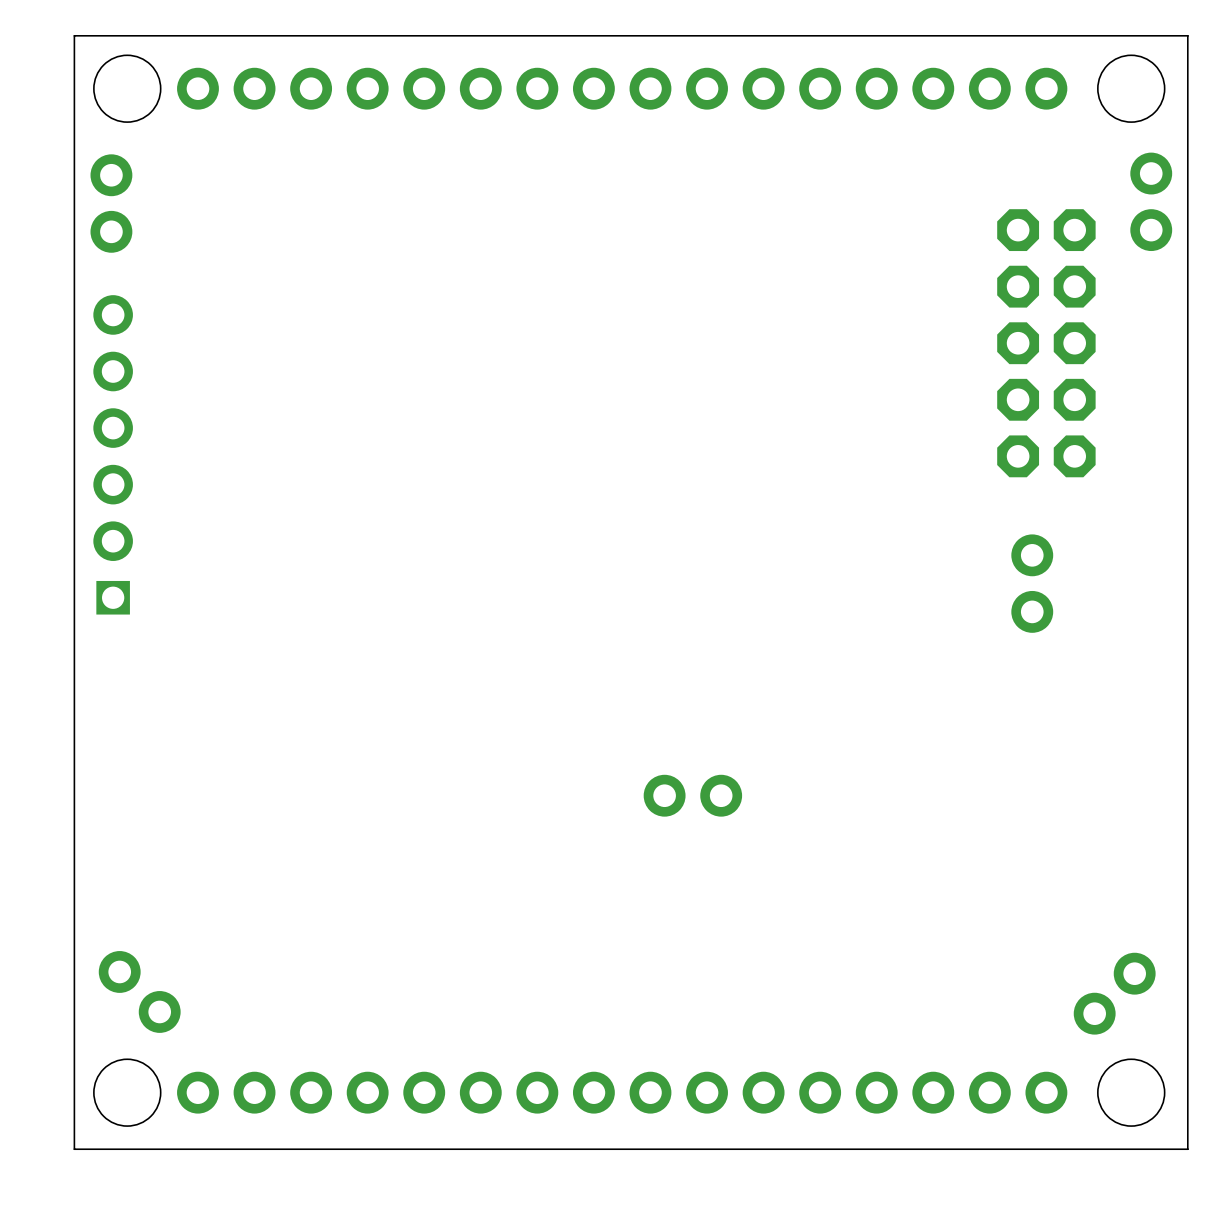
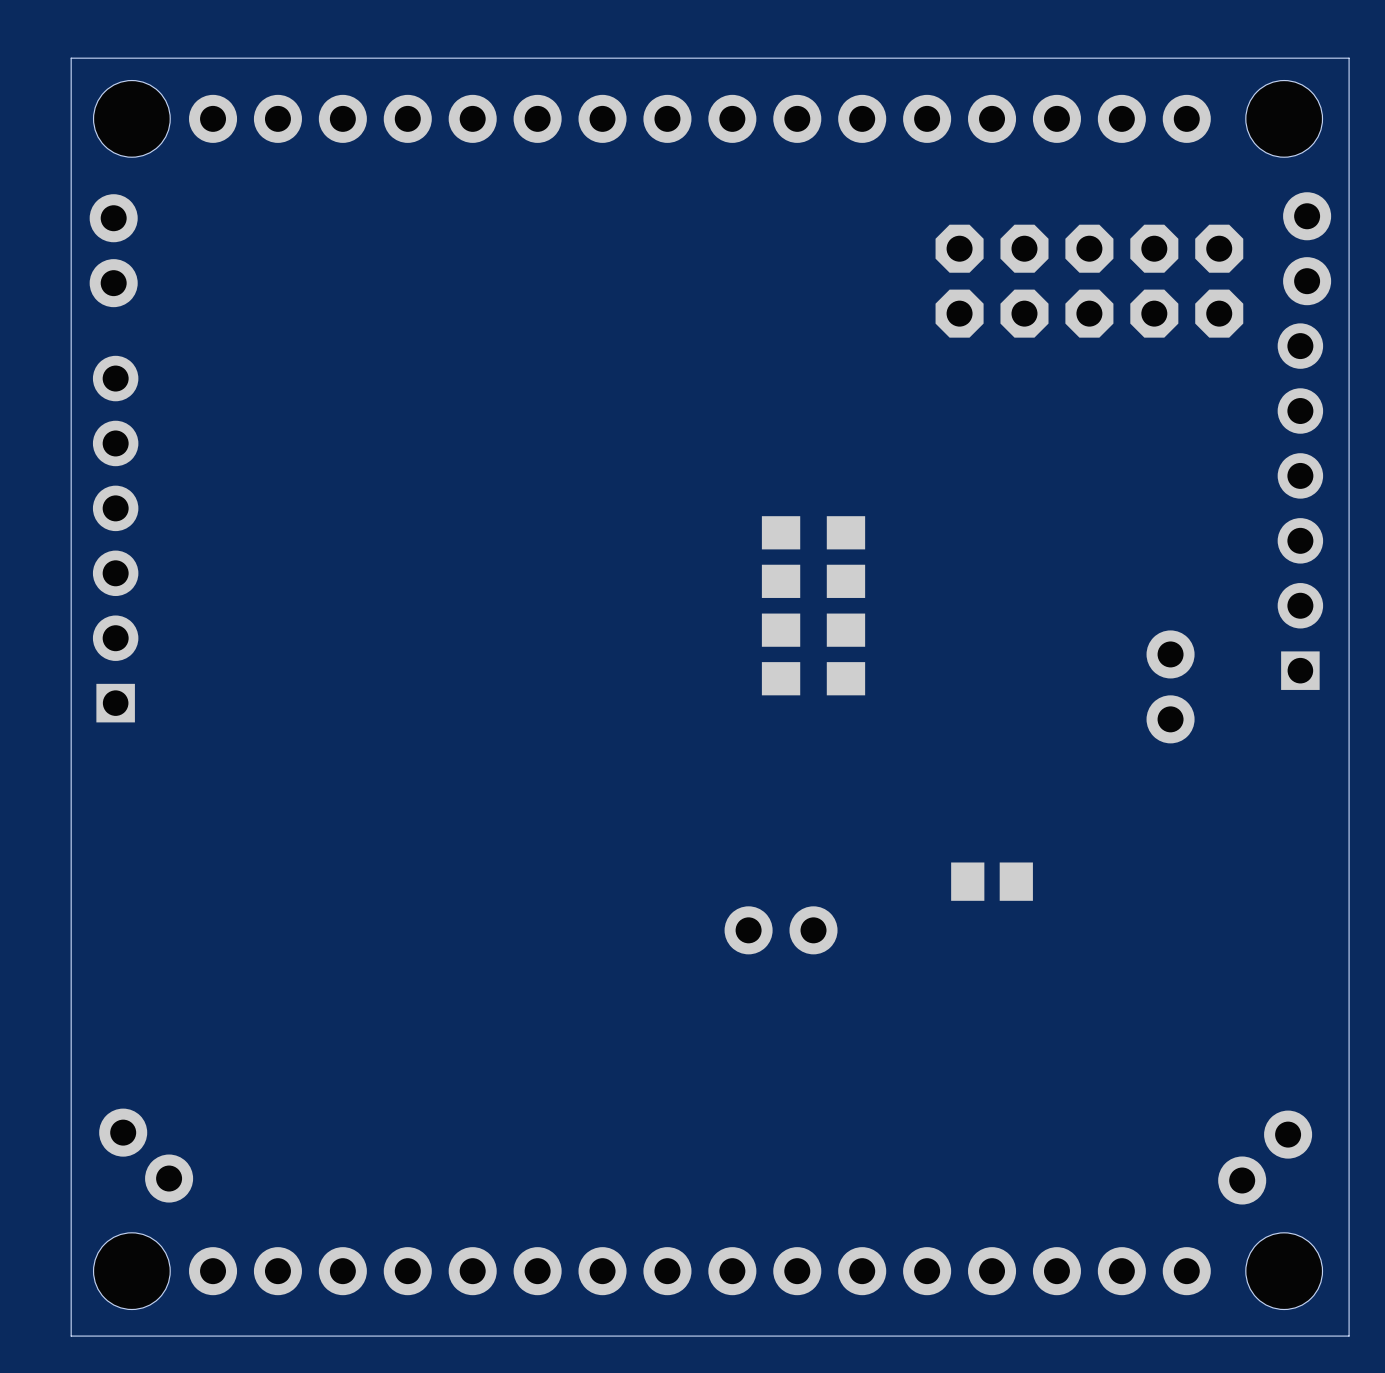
part rotation: 0° (1046, 343) -> 90° clockwise (1089, 281)
part: none -> (1300, 506)
part: none -> (781, 557)
part: none -> (845, 557)
part: none -> (781, 654)
part: none -> (845, 654)
part: none -> (992, 881)

